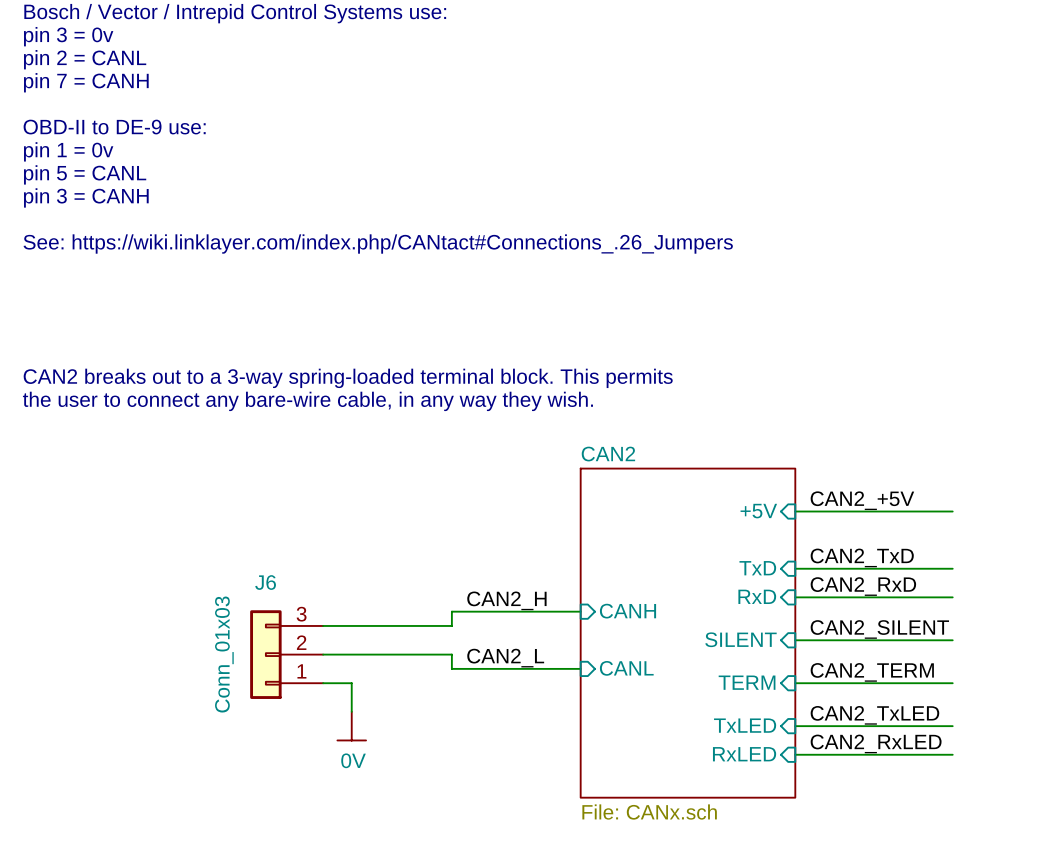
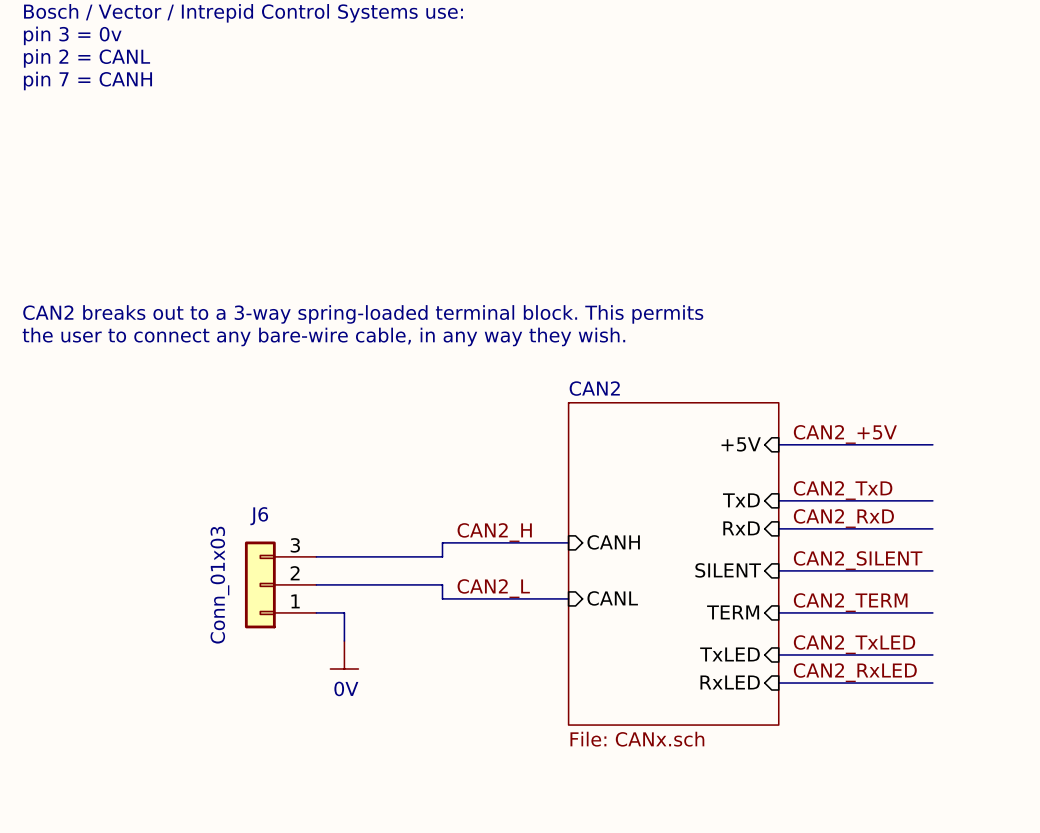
text: OBD-II to DE-9 use: (114, 127) -> none
text: pin 1 = 0v (68, 151) -> none
text: pin 5 = CANL (85, 174) -> none
text: pin 3 = CANH (86, 197) -> none
text: See: https://wiki.linklayer.com/index.php/CANtact#Connections_.26_Jumpers (378, 244) -> none
text position: CAN2 breaks out to a 3-way spring-loaded terminal block. This permits (348, 378) -> CAN2 breaks out to a 3-way spring-loaded terminal block. This permits (363, 314)
text position: the user to connect any bare-wire cable, in any way they wish. (307, 401) -> the user to connect any bare-wire cable, in any way they wish. (323, 336)
label: none -> CAN2_+5V (845, 434)
sheet pin: none -> +5V (741, 444)
label: CAN2_+5V (862, 500) -> CAN2_TxD (843, 490)
sheet pin: +5V (758, 511) -> TxD (741, 500)
label: none -> CAN2_H (494, 532)
sheet pin: none -> CANH (613, 542)
wire: none -> (568, 542) (442, 542) (442, 556) (316, 556)
label: CAN2_TxD (862, 557) -> none
sheet pin: TxD (757, 568) -> none
wire: (795, 568) (952, 568) -> (778, 444) (932, 444)
label position: CAN2_RxD (863, 586) -> CAN2_RxD (843, 518)
sheet pin position: RxD (757, 596) -> RxD (741, 528)
wire: (795, 597) (952, 597) -> (778, 528) (932, 528)
label: CAN2_H (506, 600) -> CAN2_L (493, 588)
wire: (451, 611) (451, 625) (351, 625) -> (442, 598) (442, 584) (316, 584)
sheet pin: CANH (627, 611) -> CANL (612, 598)
wire: none -> (344, 612) (344, 640)
label position: CAN2_SILENT (879, 629) -> CAN2_SILENT (858, 560)
sheet CAN2 position: (687, 633) -> (673, 563)
sheet pin position: SILENT (740, 639) -> SILENT (728, 570)
wire: (795, 640) (952, 640) -> (778, 570) (932, 570)
J6 position: (286, 654) -> (280, 584)
wire: (323, 654) (451, 654) (451, 668) (580, 668) -> none
label: CAN2_L (505, 658) -> none
sheet pin: CANL (626, 668) -> none
label position: CAN2_TERM (872, 672) -> CAN2_TERM (850, 602)
sheet pin position: TERM (747, 682) -> TERM (733, 612)
wire: (323, 683) (351, 683) (351, 711) -> none
wire: (795, 683) (952, 683) -> (778, 612) (932, 612)
label position: CAN2_TxLED (874, 715) -> CAN2_TxLED (854, 644)
sheet pin position: TxLED (745, 725) -> TxLED (729, 654)
power symbol position: 0V (351, 726) -> 0V (344, 654)
wire: (795, 726) (952, 726) -> (778, 654) (932, 654)
label position: CAN2_RxLED (876, 743) -> CAN2_RxLED (855, 672)
sheet pin position: RxLED (744, 754) -> RxLED (730, 682)
wire: (795, 754) (952, 754) -> (778, 683) (932, 683)

